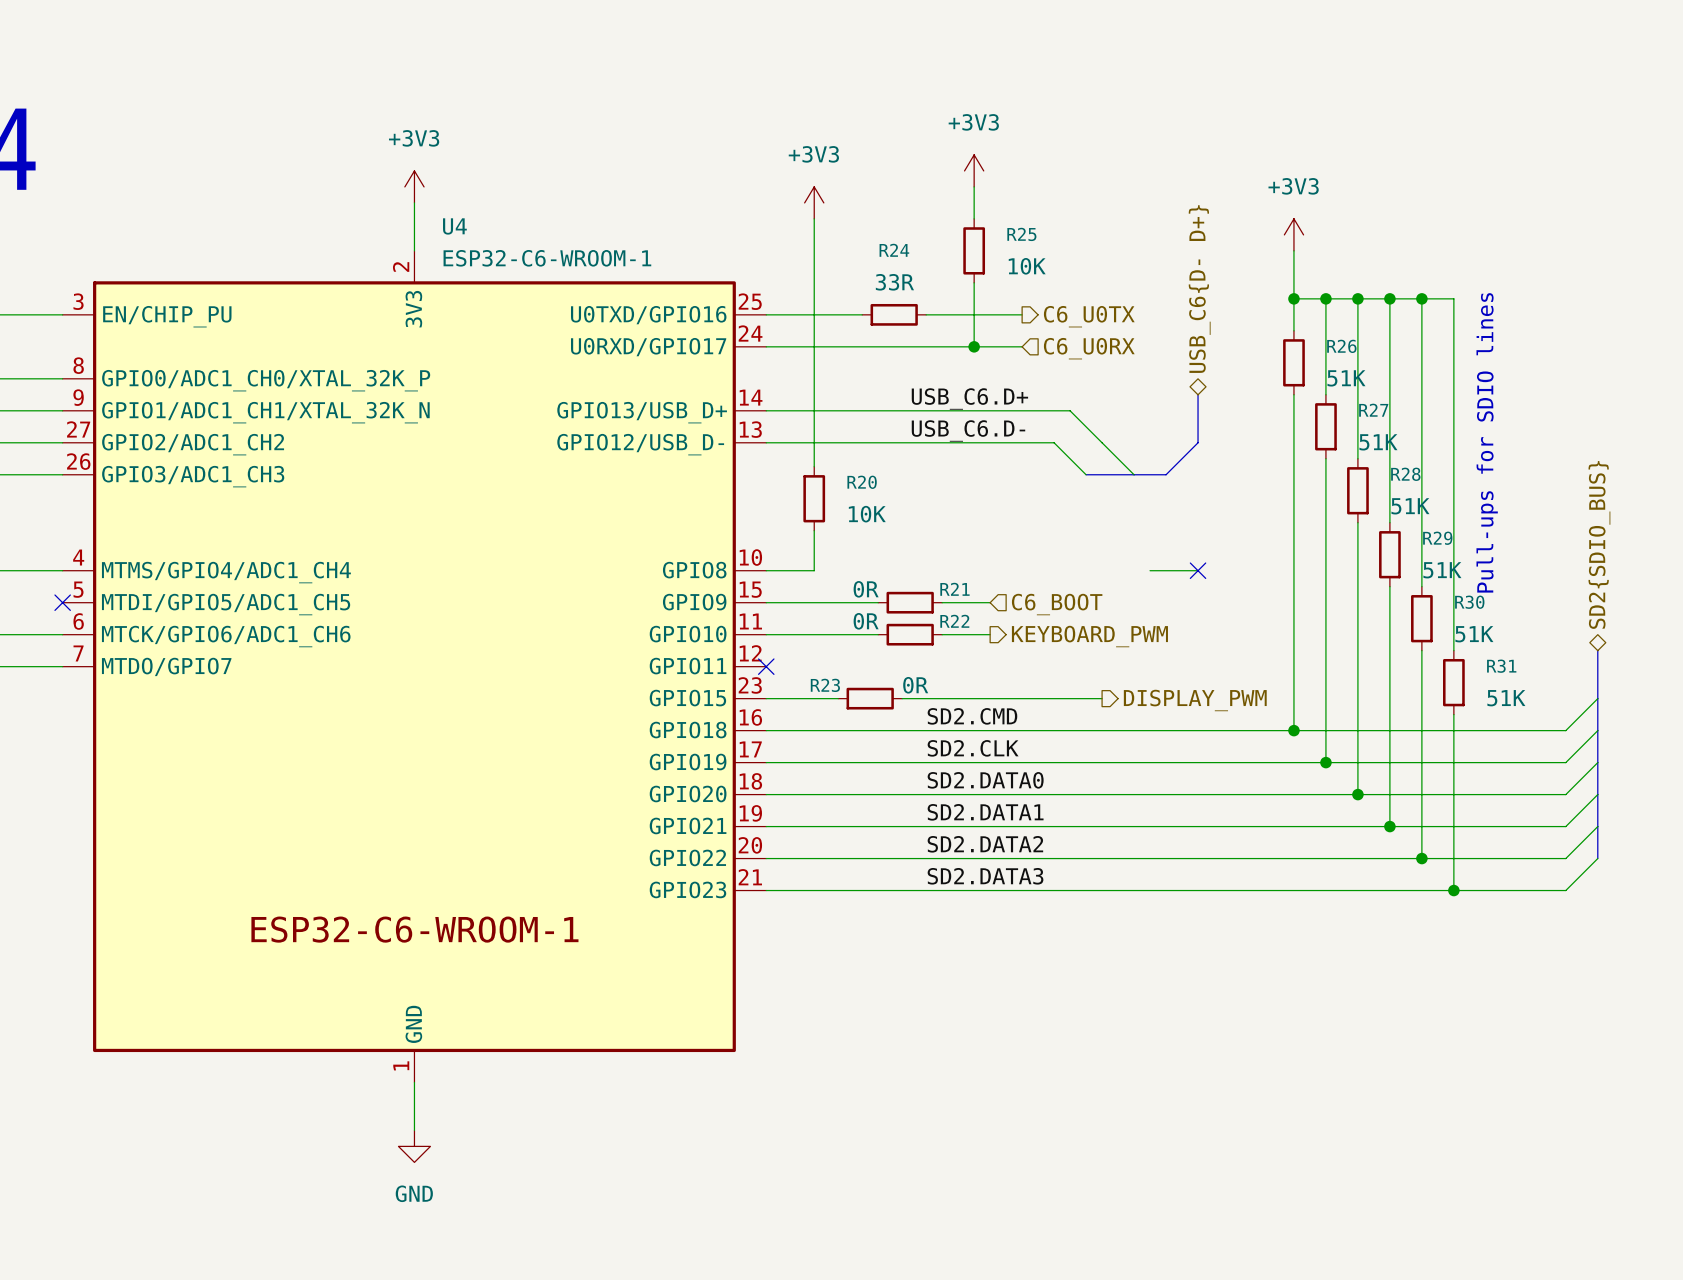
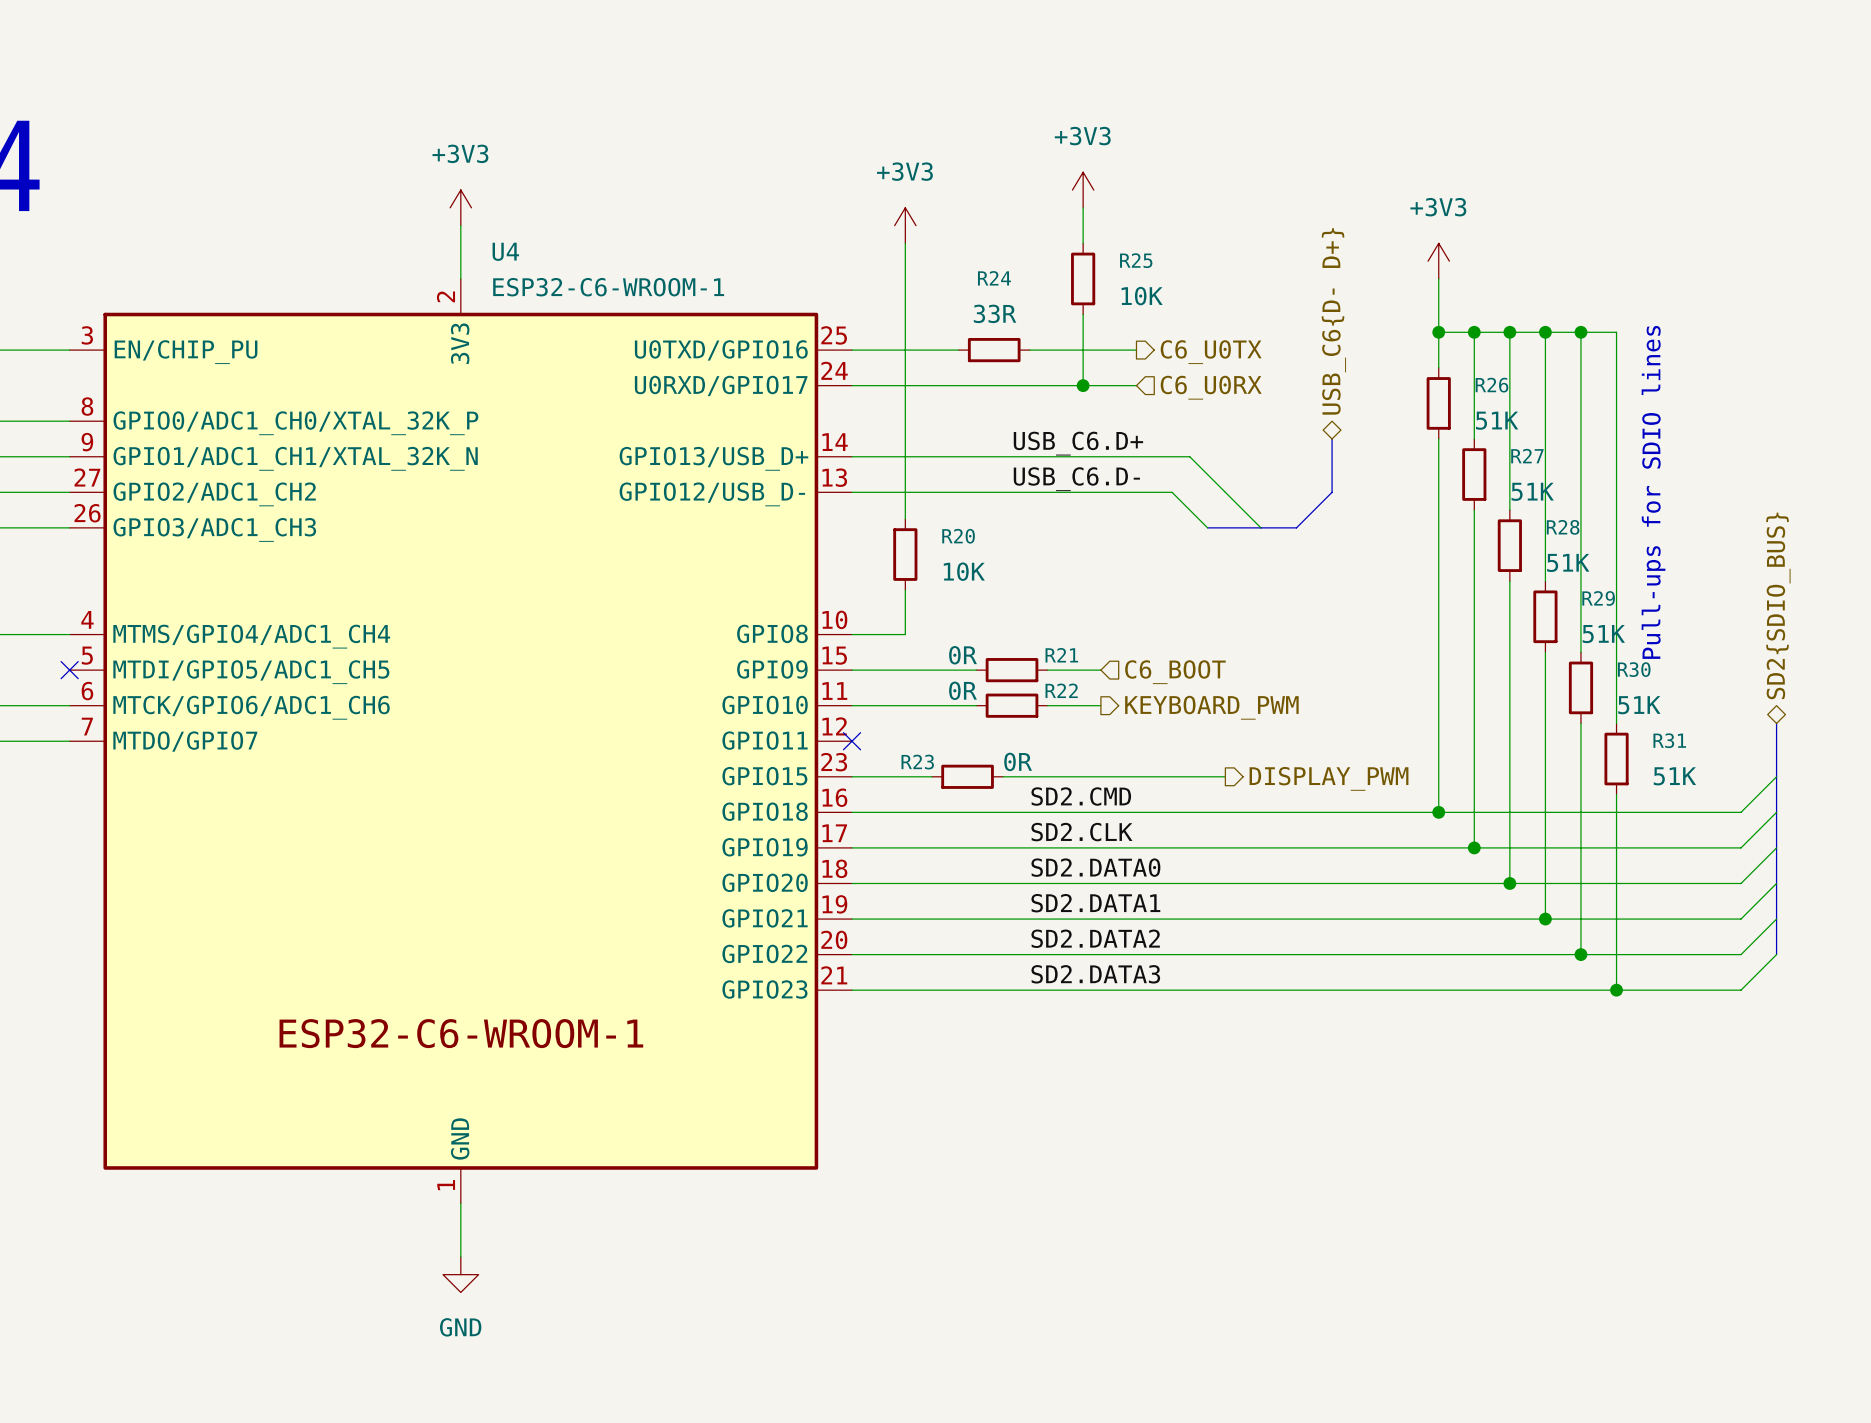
wire: (1150, 570) (1198, 570) -> none
no-connect mark: (1198, 570) -> none

